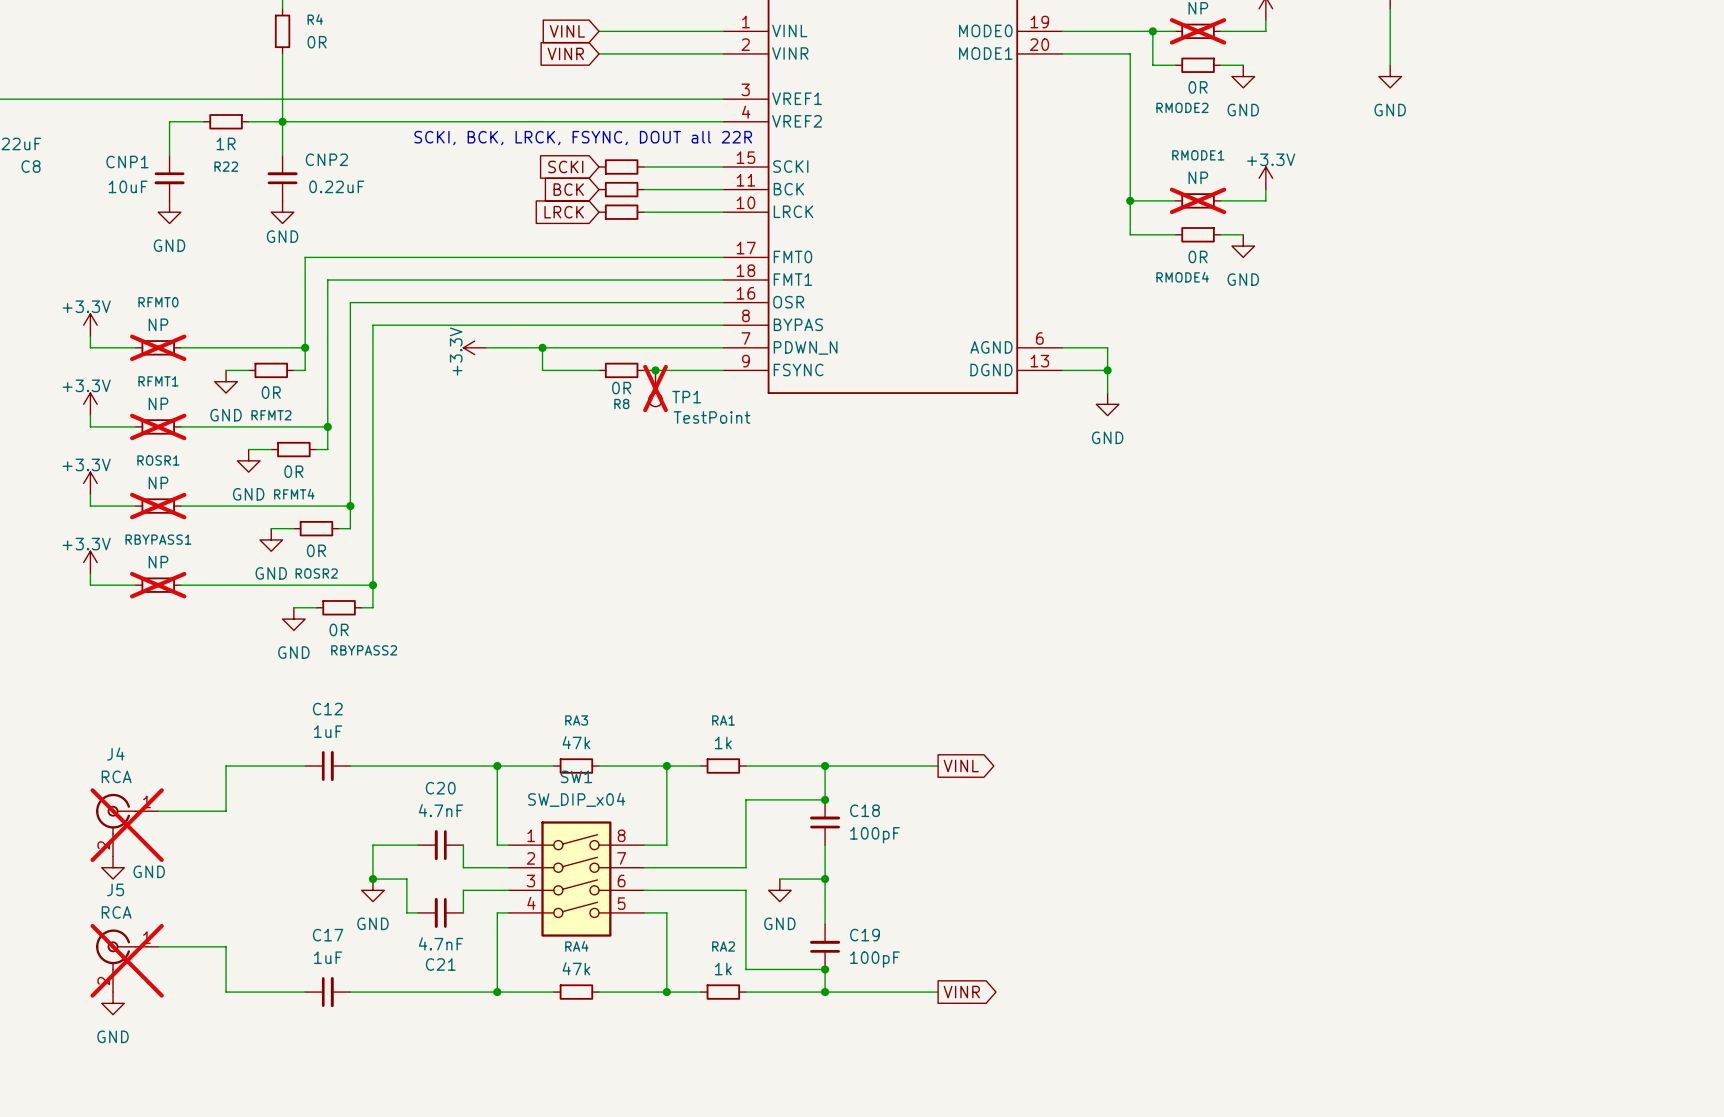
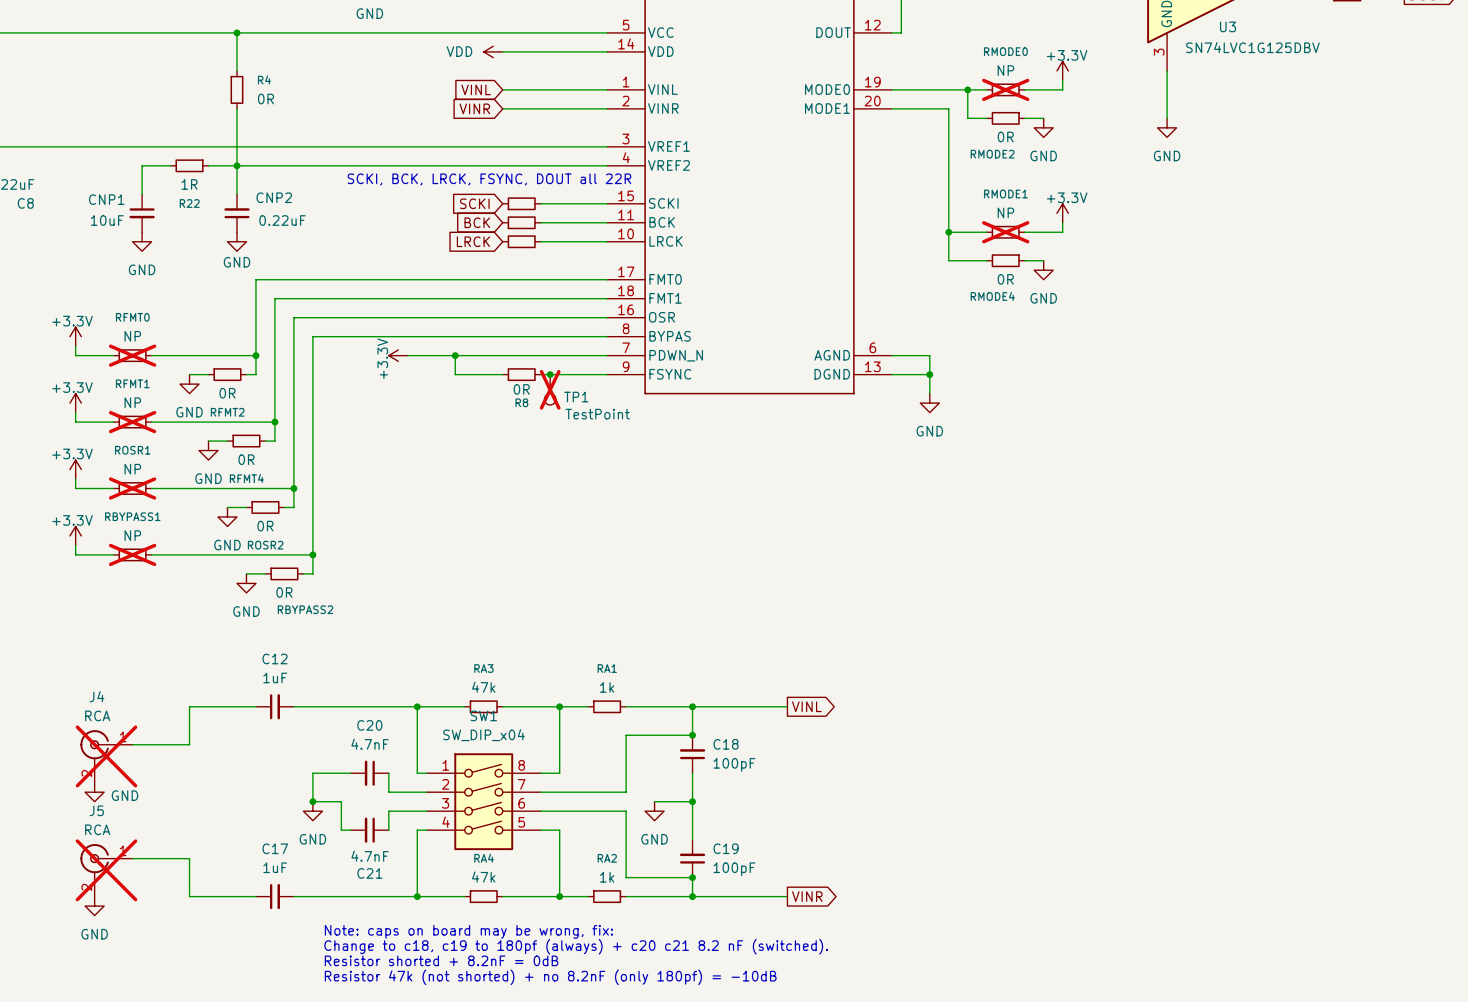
text: none -> Note: caps on board may be wrong, fix: (468, 931)
text: none -> Change to c18, c19 to 180pf (always) + c20 c21 8.2 nF (switched). (576, 946)
text: none -> Resistor shorted + 8.2nF = 0dB (441, 960)
text: none -> Resistor 47k (not shorted) + no 8.2nF (only 180pf) = -10dB (550, 977)

